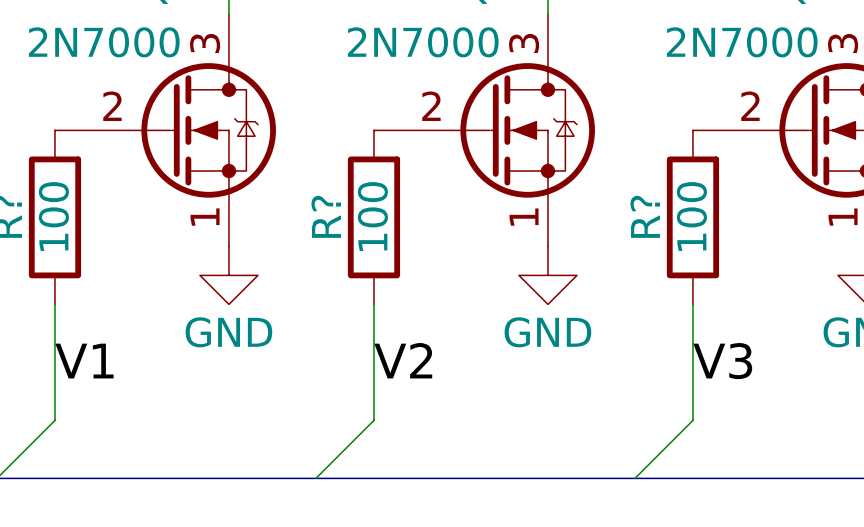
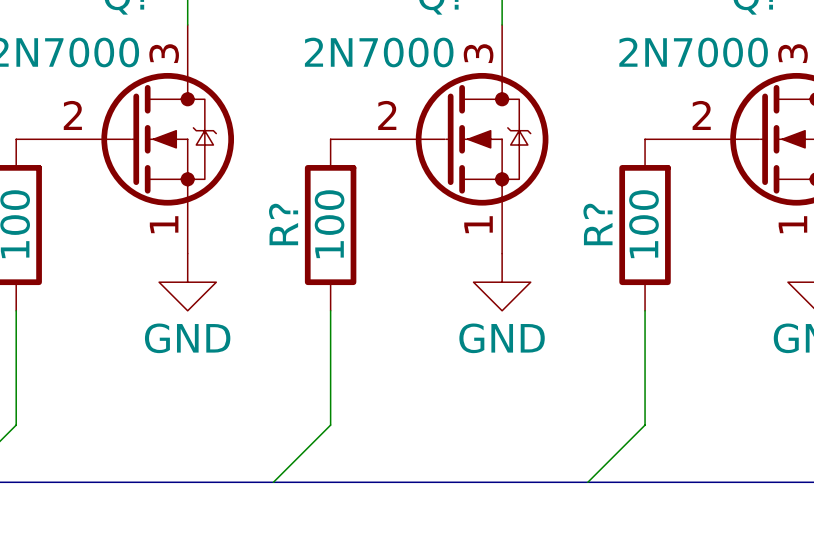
label: V2 (403, 360) -> none
label: V1 (84, 361) -> none
label: V3 (722, 361) -> none

